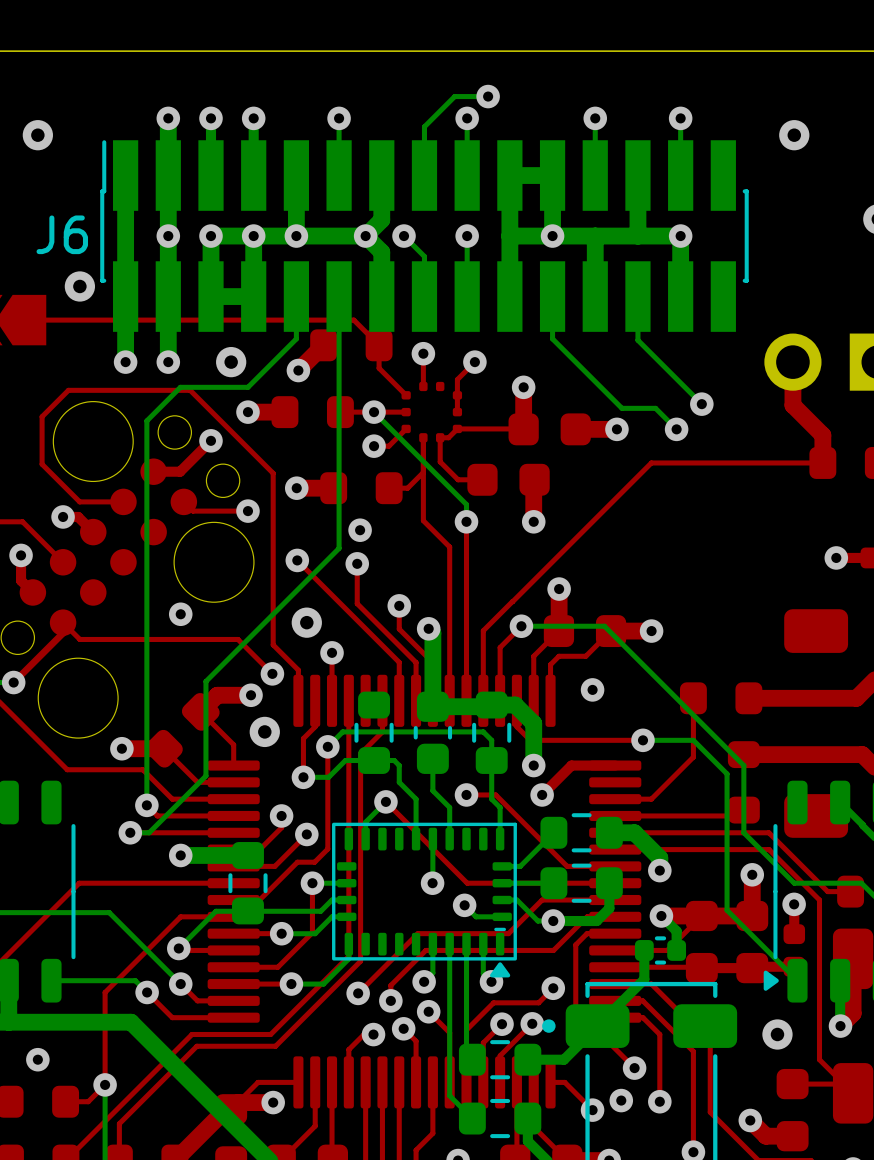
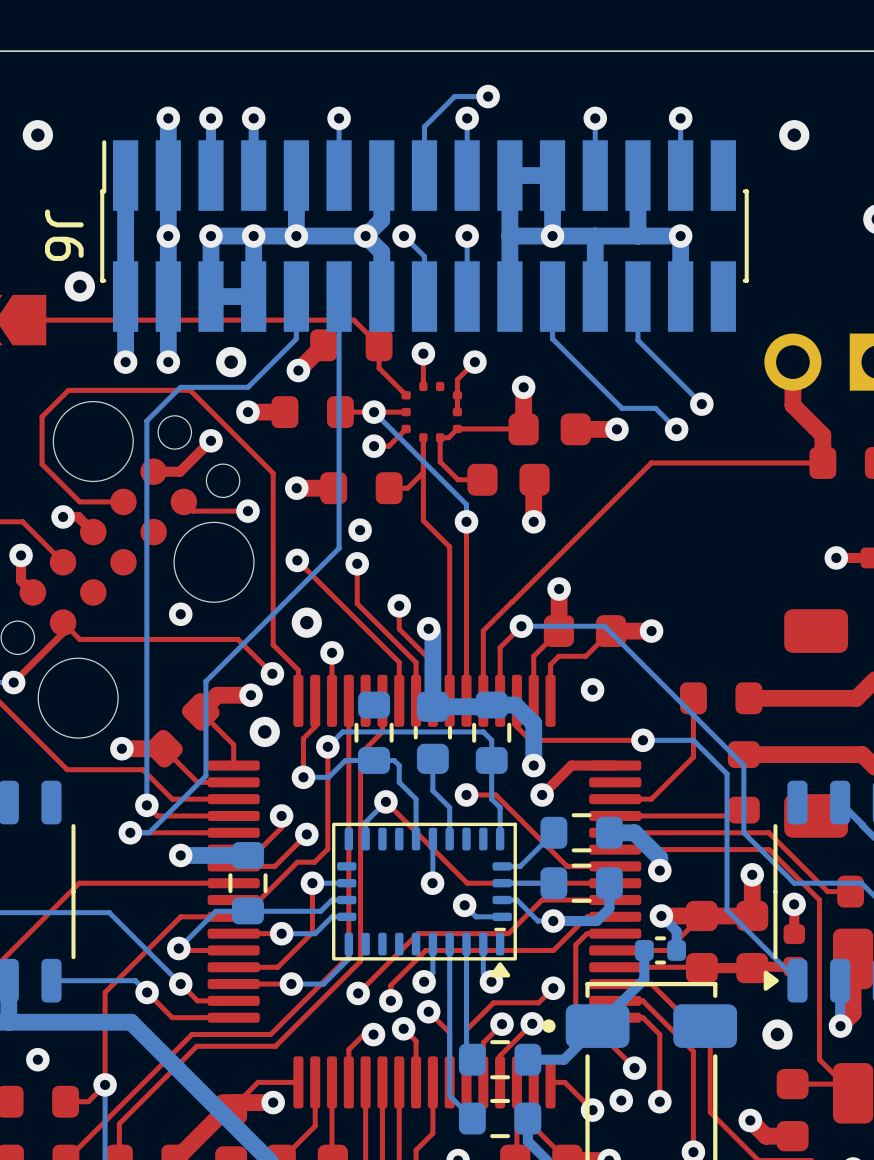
J6 name rotation: 0° (62, 234) -> 90° clockwise (64, 235)

